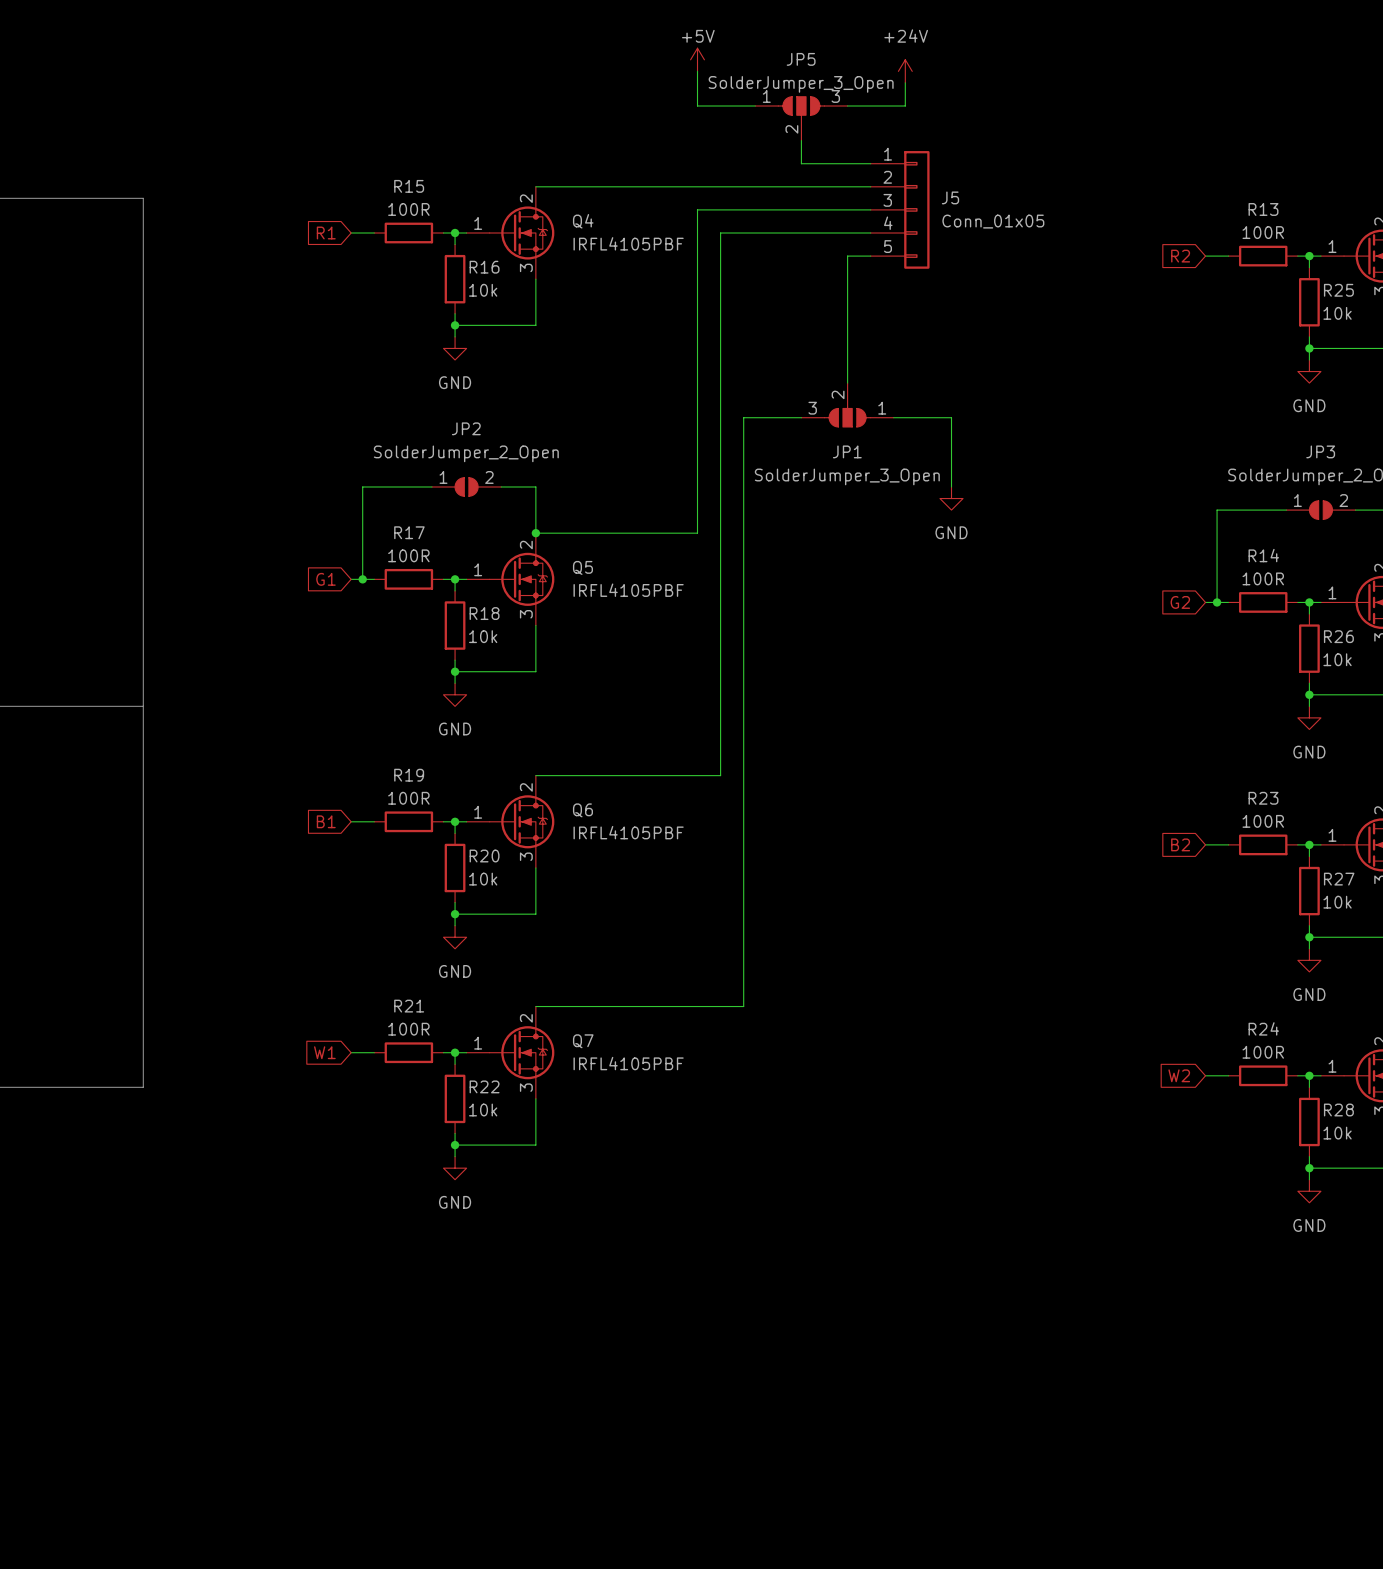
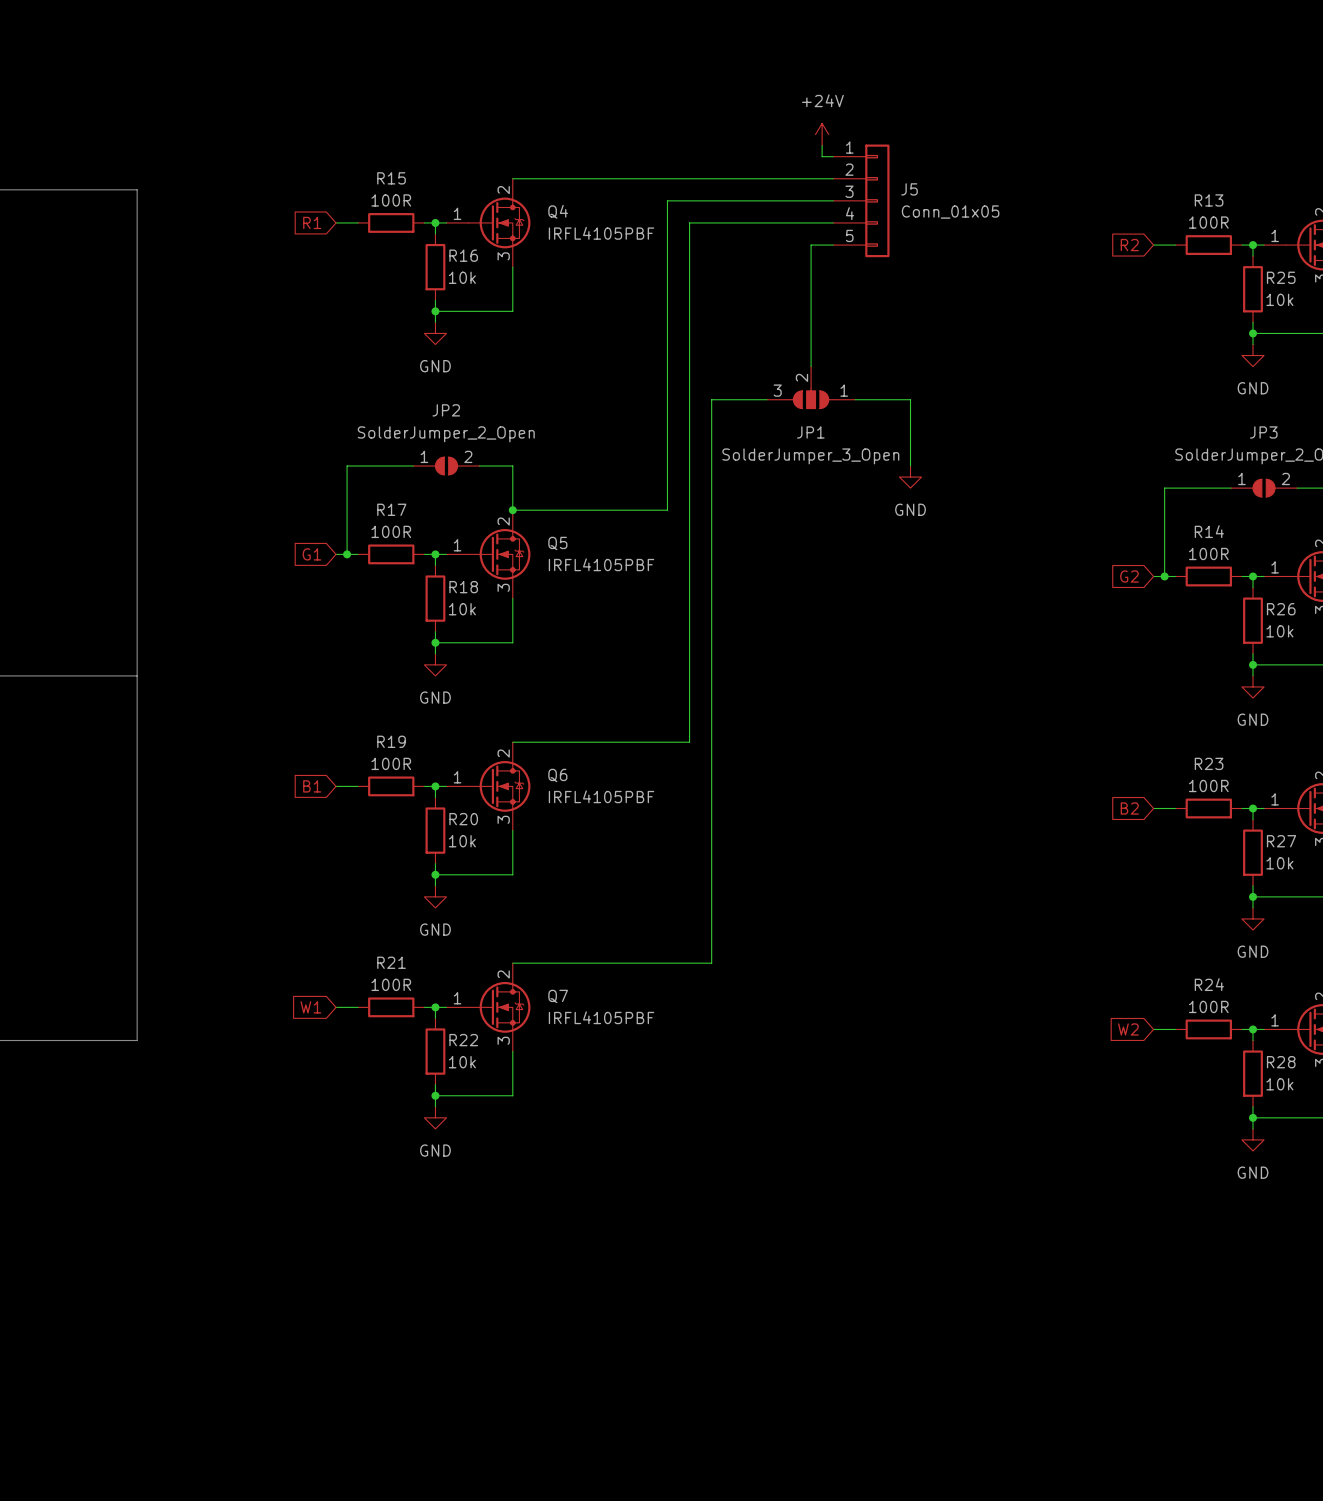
power symbol: +5V (697, 59) -> none
wire: (697, 71) (697, 105) (755, 105) -> none
power symbol position: +24V (905, 71) -> +24V (822, 134)
wire: (905, 82) (905, 105) (847, 105) -> none
JP5: SolderJumper_3_Open (801, 118) -> none
wire: (801, 140) (801, 163) (859, 163) -> (822, 145) (822, 156)

